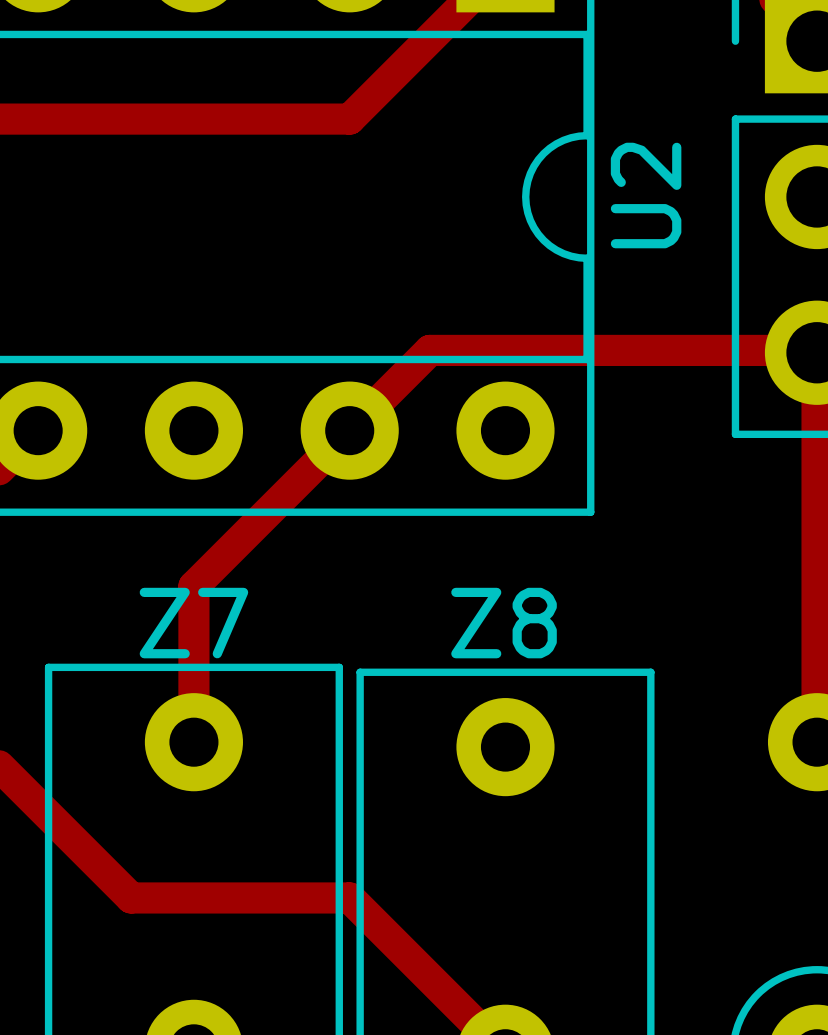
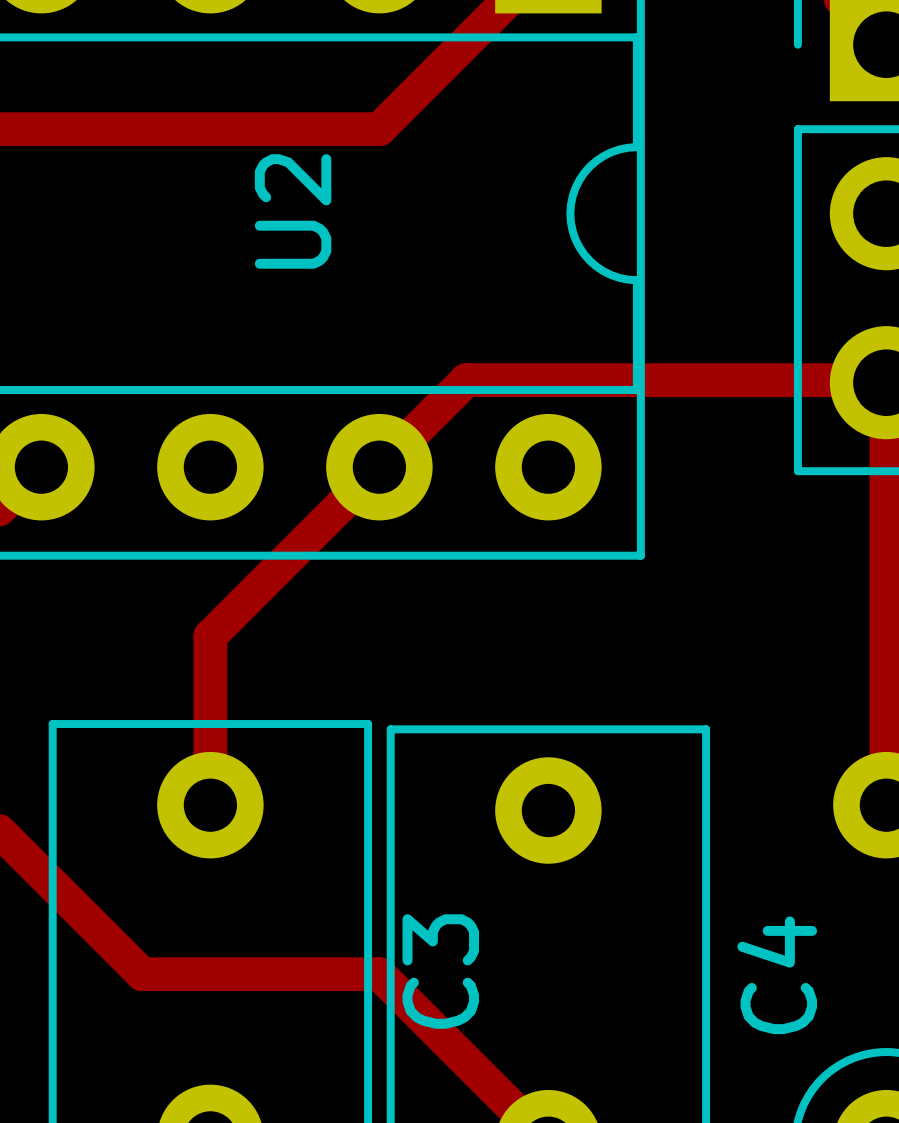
U2 name position: U2 (646, 195) -> U2 (293, 211)
Z7 name: Z7 (193, 623) -> C3 (440, 971)
Z8 name: Z8 (504, 623) -> C4 (777, 975)

